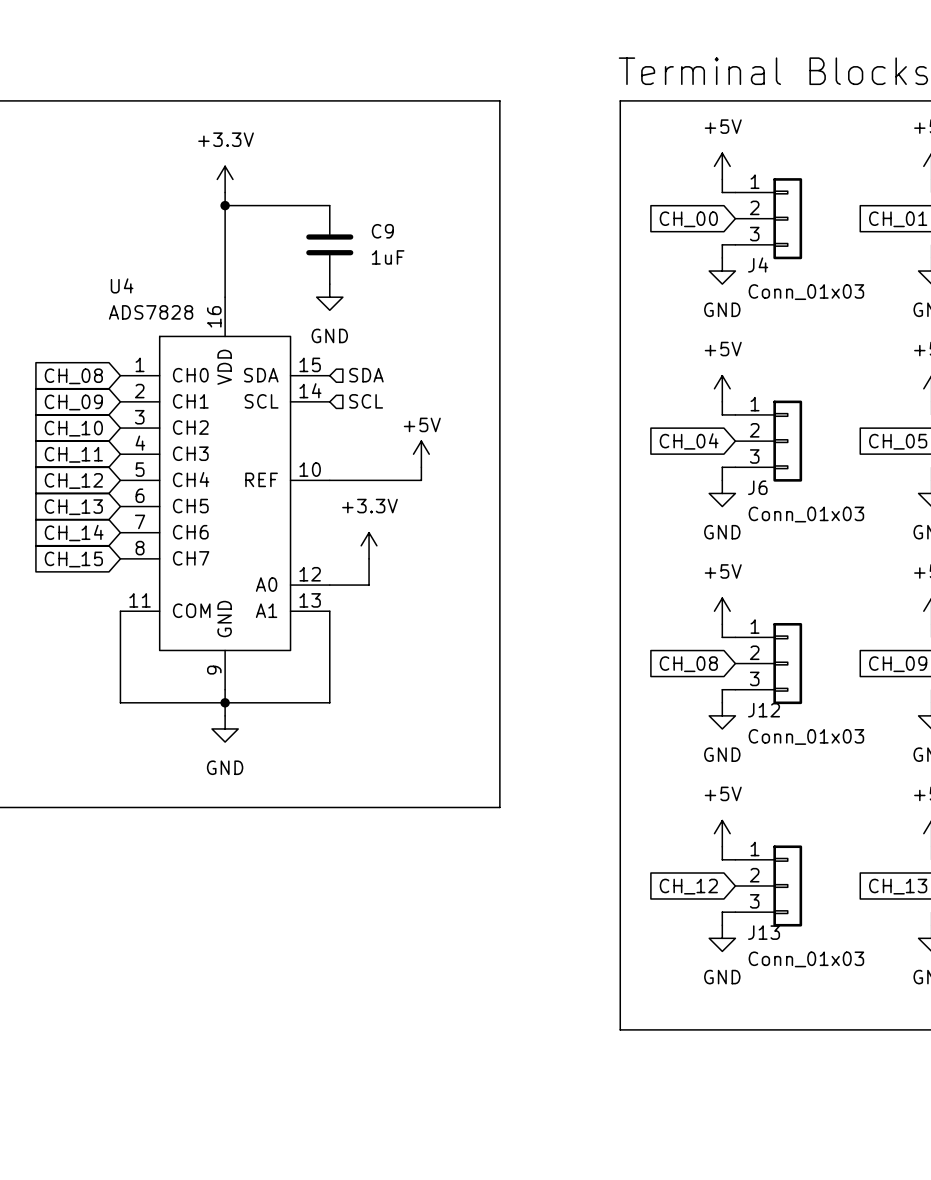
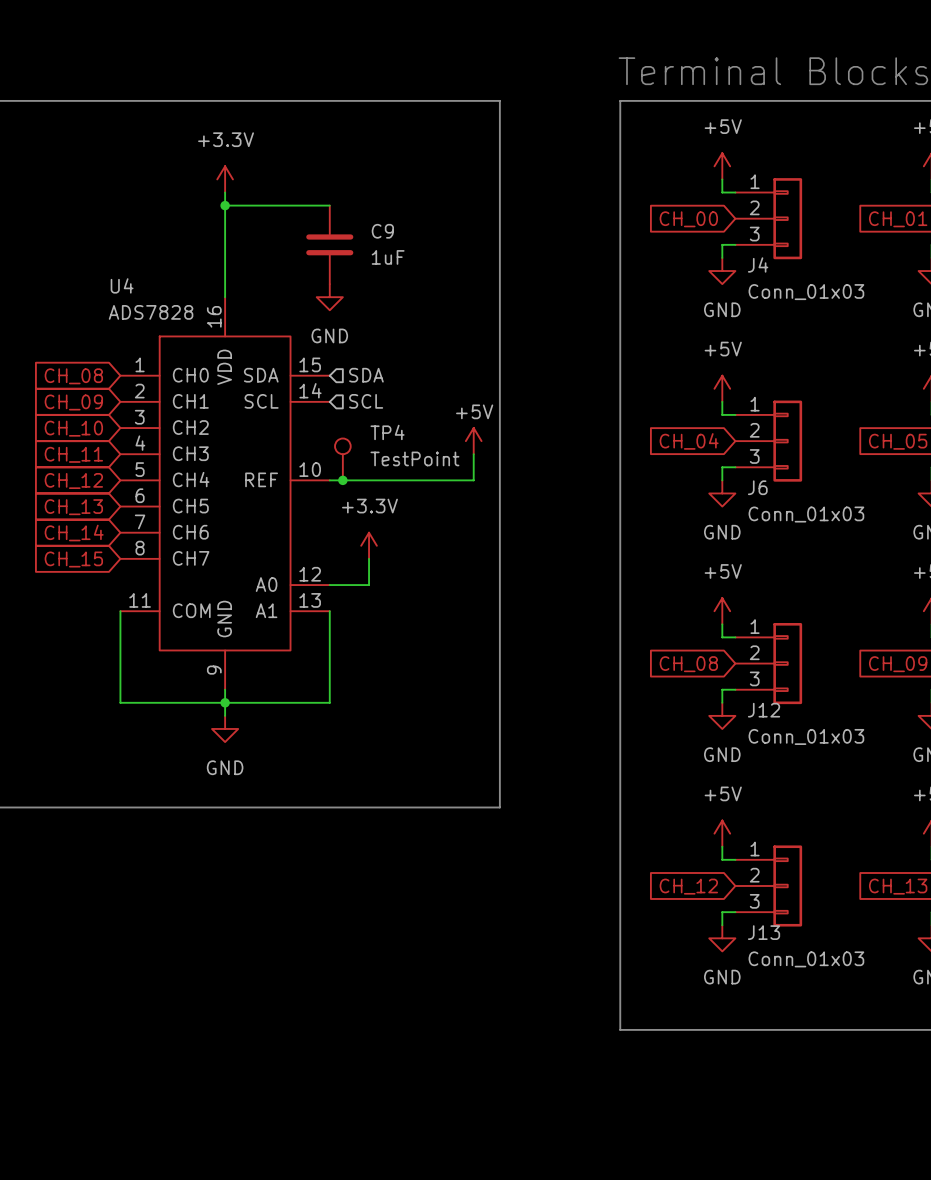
power symbol position: +5V (421, 454) -> +5V (473, 441)
TP4: none -> TestPoint (342, 459)
wire: (421, 467) (421, 480) -> (473, 454) (473, 480) (421, 480)
junction: none -> (342, 480)

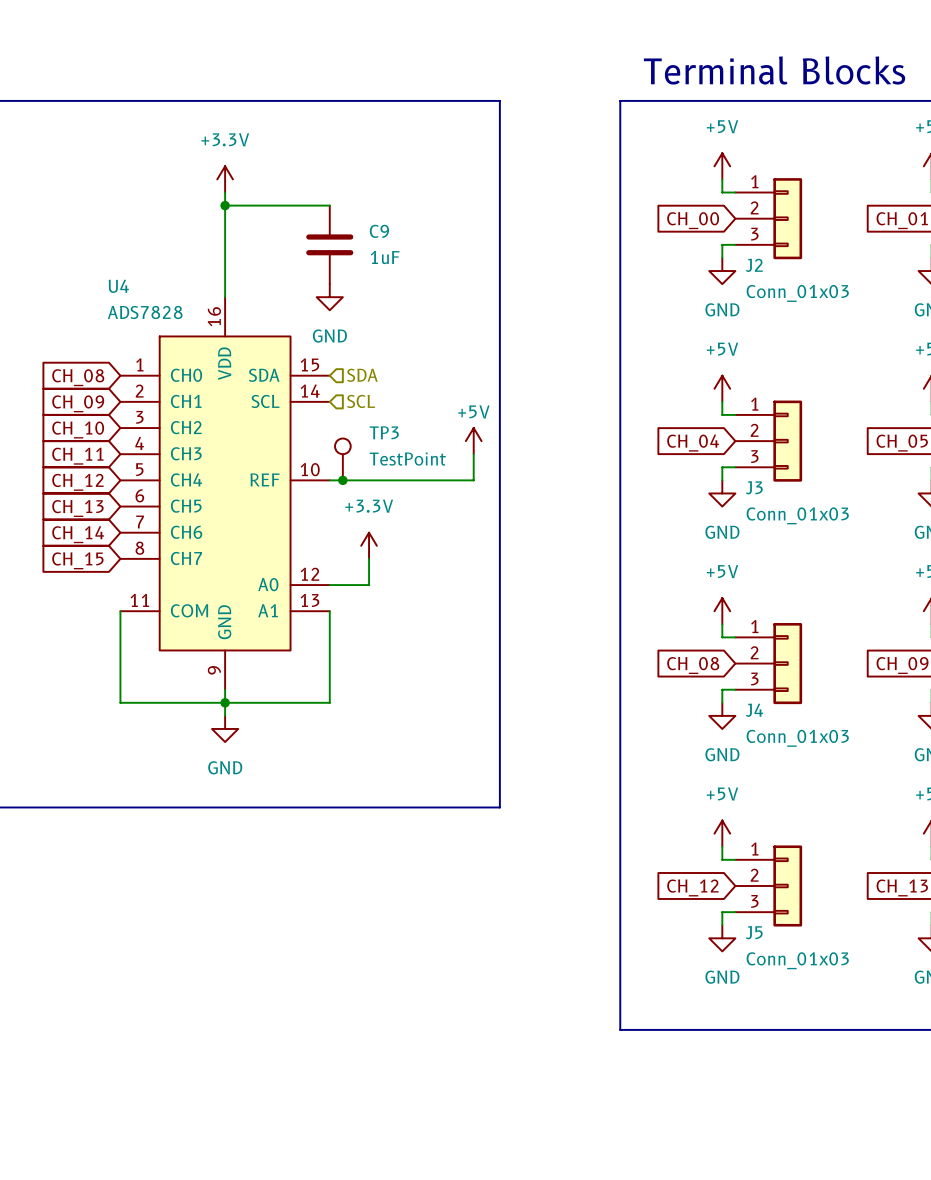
J4 name: J4 (758, 264) -> J2 (754, 265)
TP4 name: TP4 (387, 432) -> TP3 (384, 432)
J6 name: J6 (757, 487) -> J3 (754, 487)
J12 name: J12 (764, 710) -> J4 (754, 710)
J13 name: J13 (764, 932) -> J5 (754, 932)

